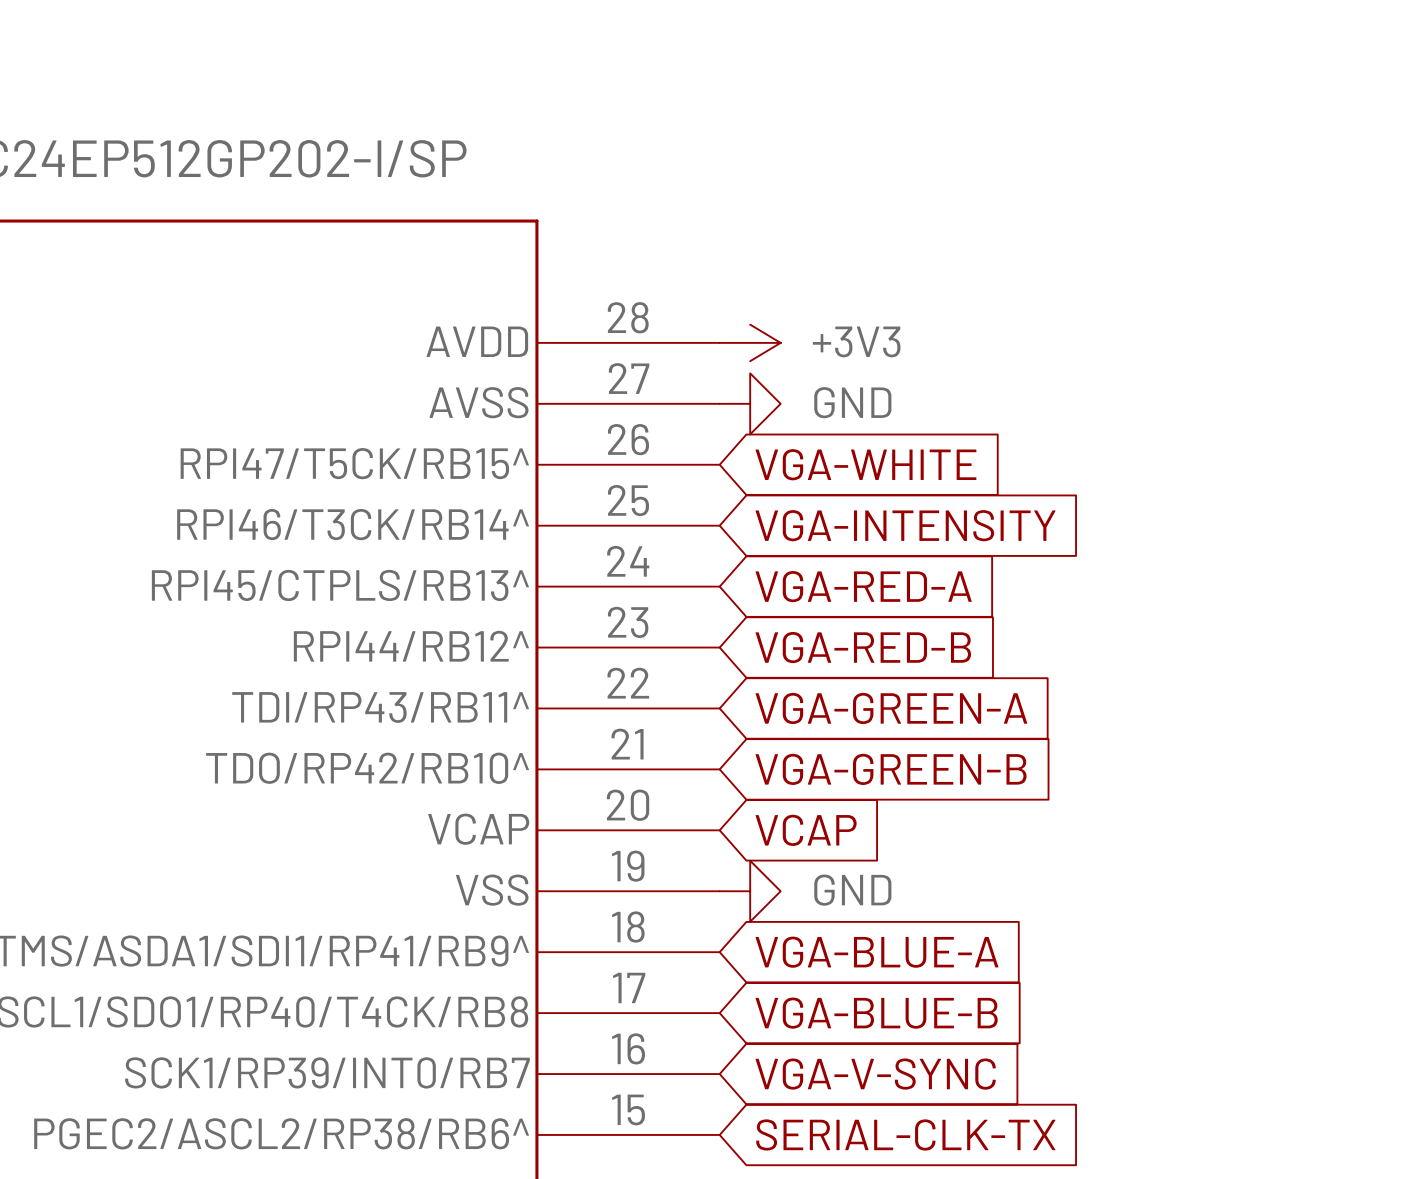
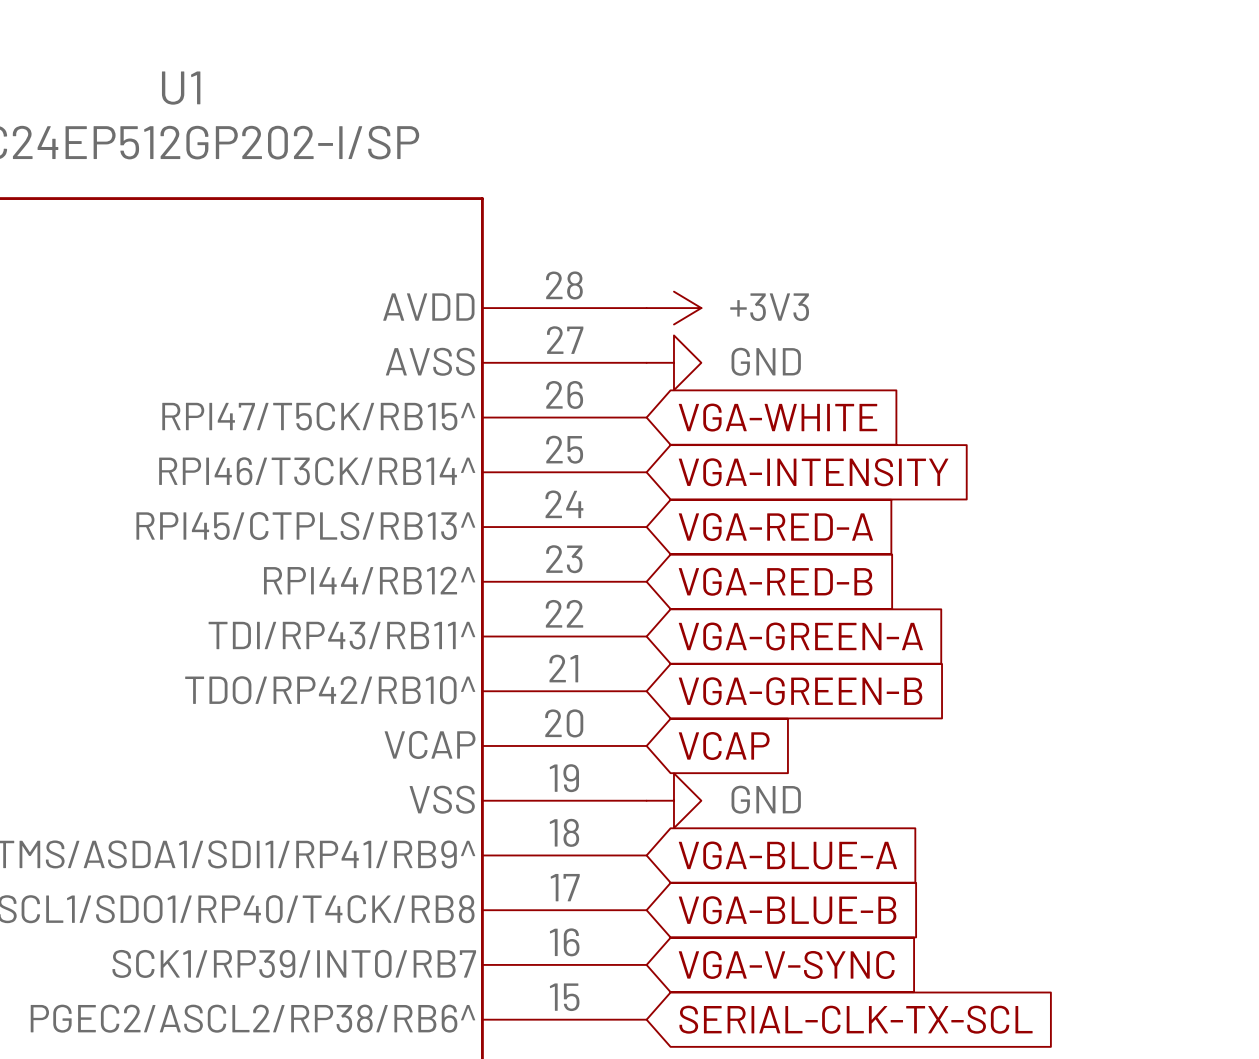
U1 name: none -> U1 (181, 88)
global label: SERIAL-CLK-TX (905, 1134) -> SERIAL-CLK-TX-SCL (856, 1019)

